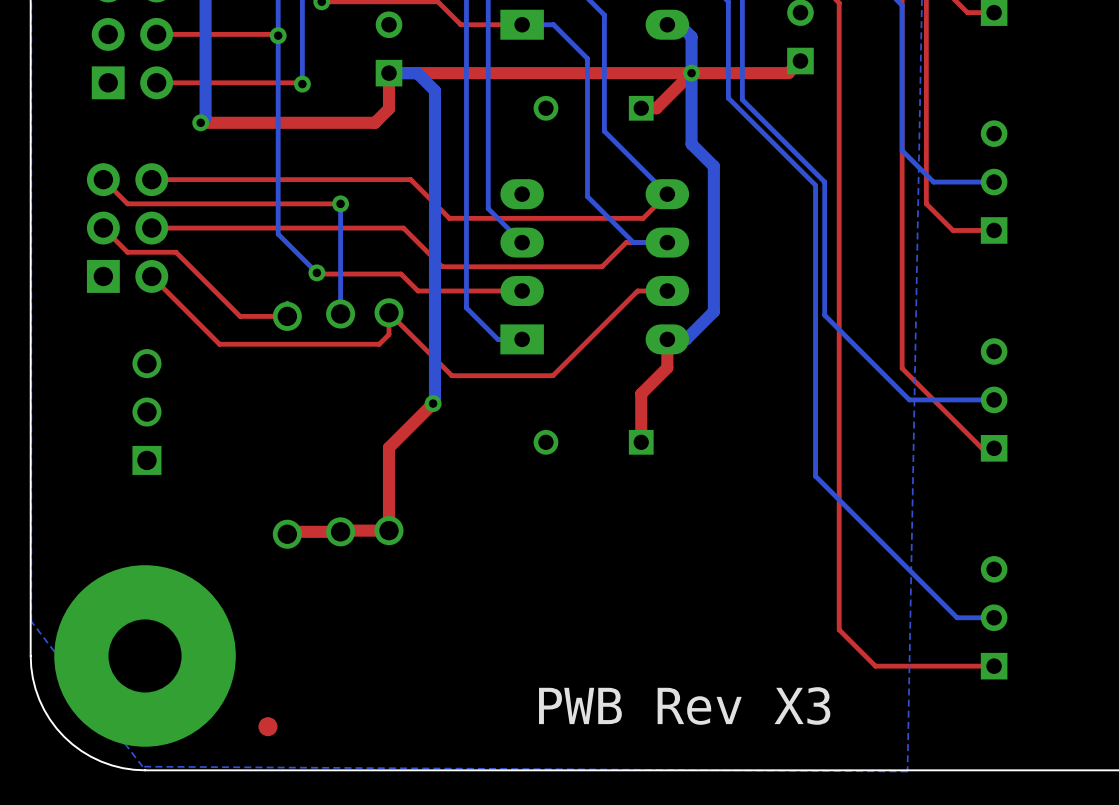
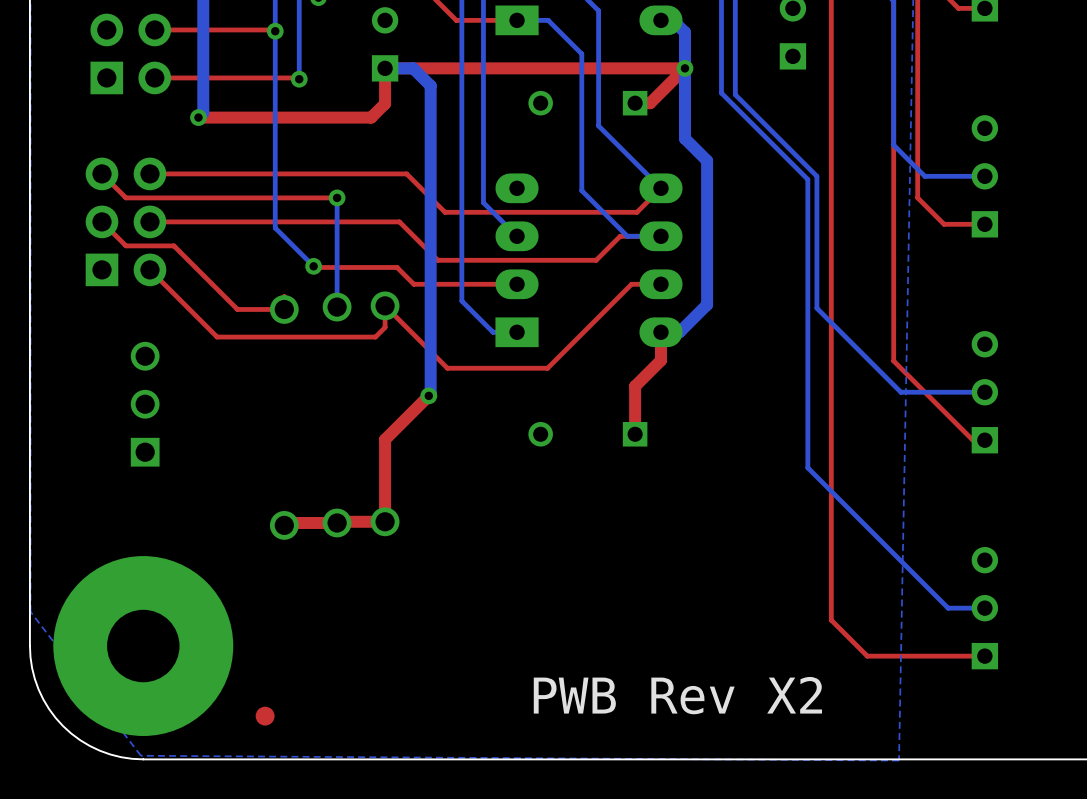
top track: (800, 61) (788, 73) (691, 73) -> none
text: PWB Rev X3 (684, 705) -> PWB Rev X2 (677, 695)

